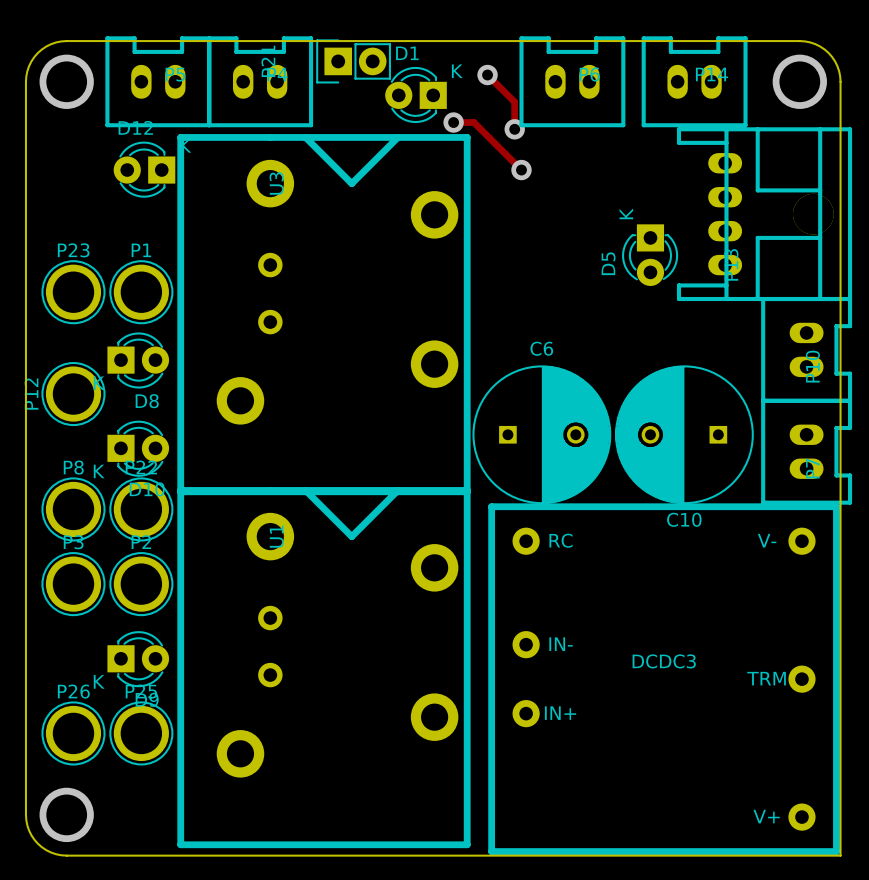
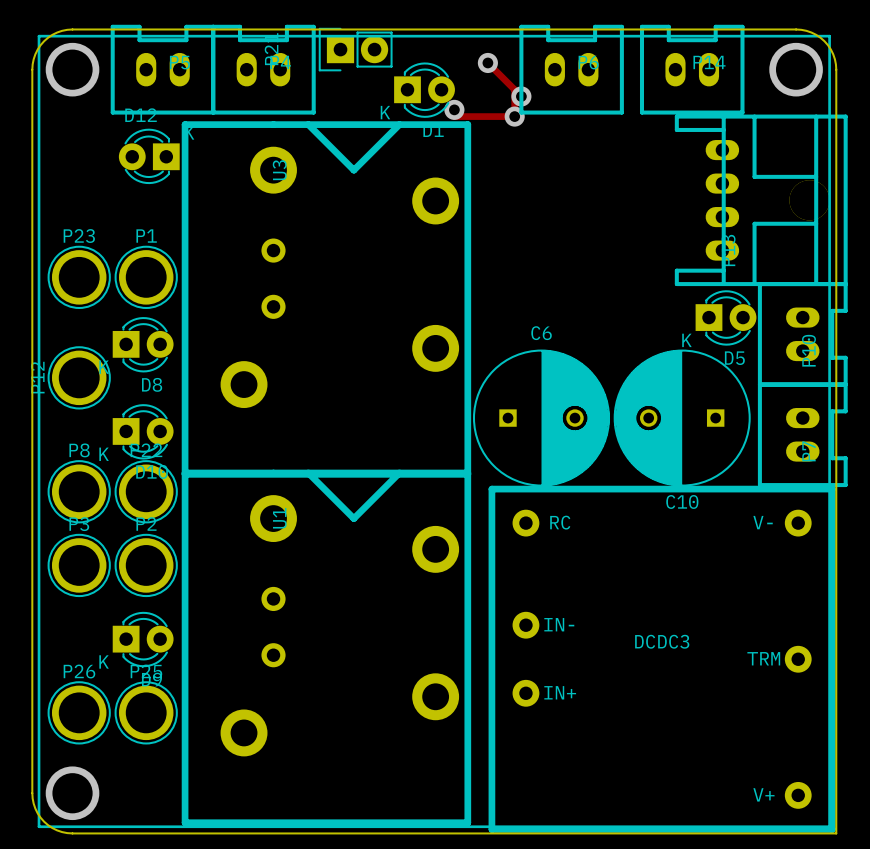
line: none -> (39, 36) (39, 826) (829, 826) (829, 36) (39, 36)
D1 rotation: 0° (416, 94) -> 180° (424, 90)
track: (453, 122) (473, 122) (521, 170) -> none
track: none -> (454, 116) (508, 116)
via position: (521, 170) -> (521, 96)
D5 rotation: 0° (650, 255) -> 90° counterclockwise (726, 317)
D5 position: (650, 255) -> (726, 317)

